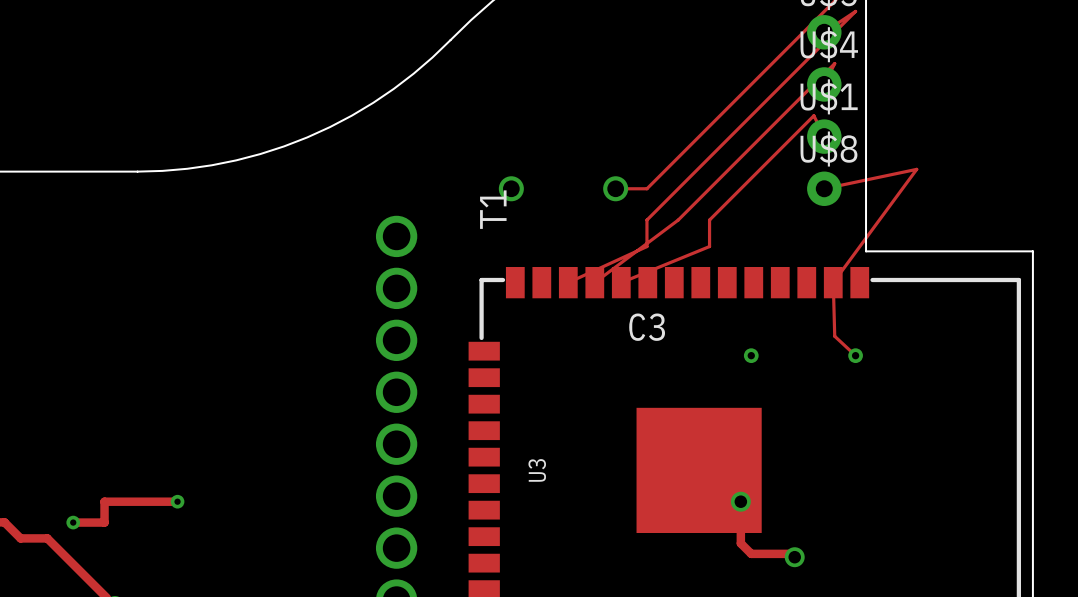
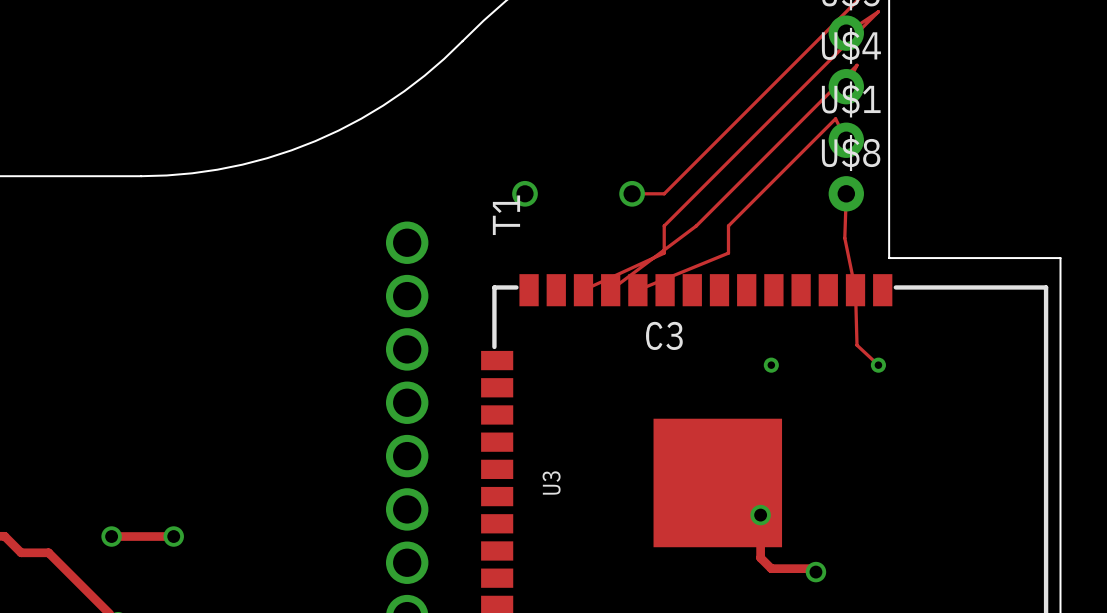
track: (824, 188) (916, 169) (833, 282) -> (846, 193) (844, 238) (855, 290)
track: (177, 501) (104, 501) (104, 522) (73, 522) -> none
via: (177, 501) -> none
via: (73, 522) -> none
track: none -> (111, 536) (173, 536)
via: none -> (111, 536)
via: none -> (173, 536)

